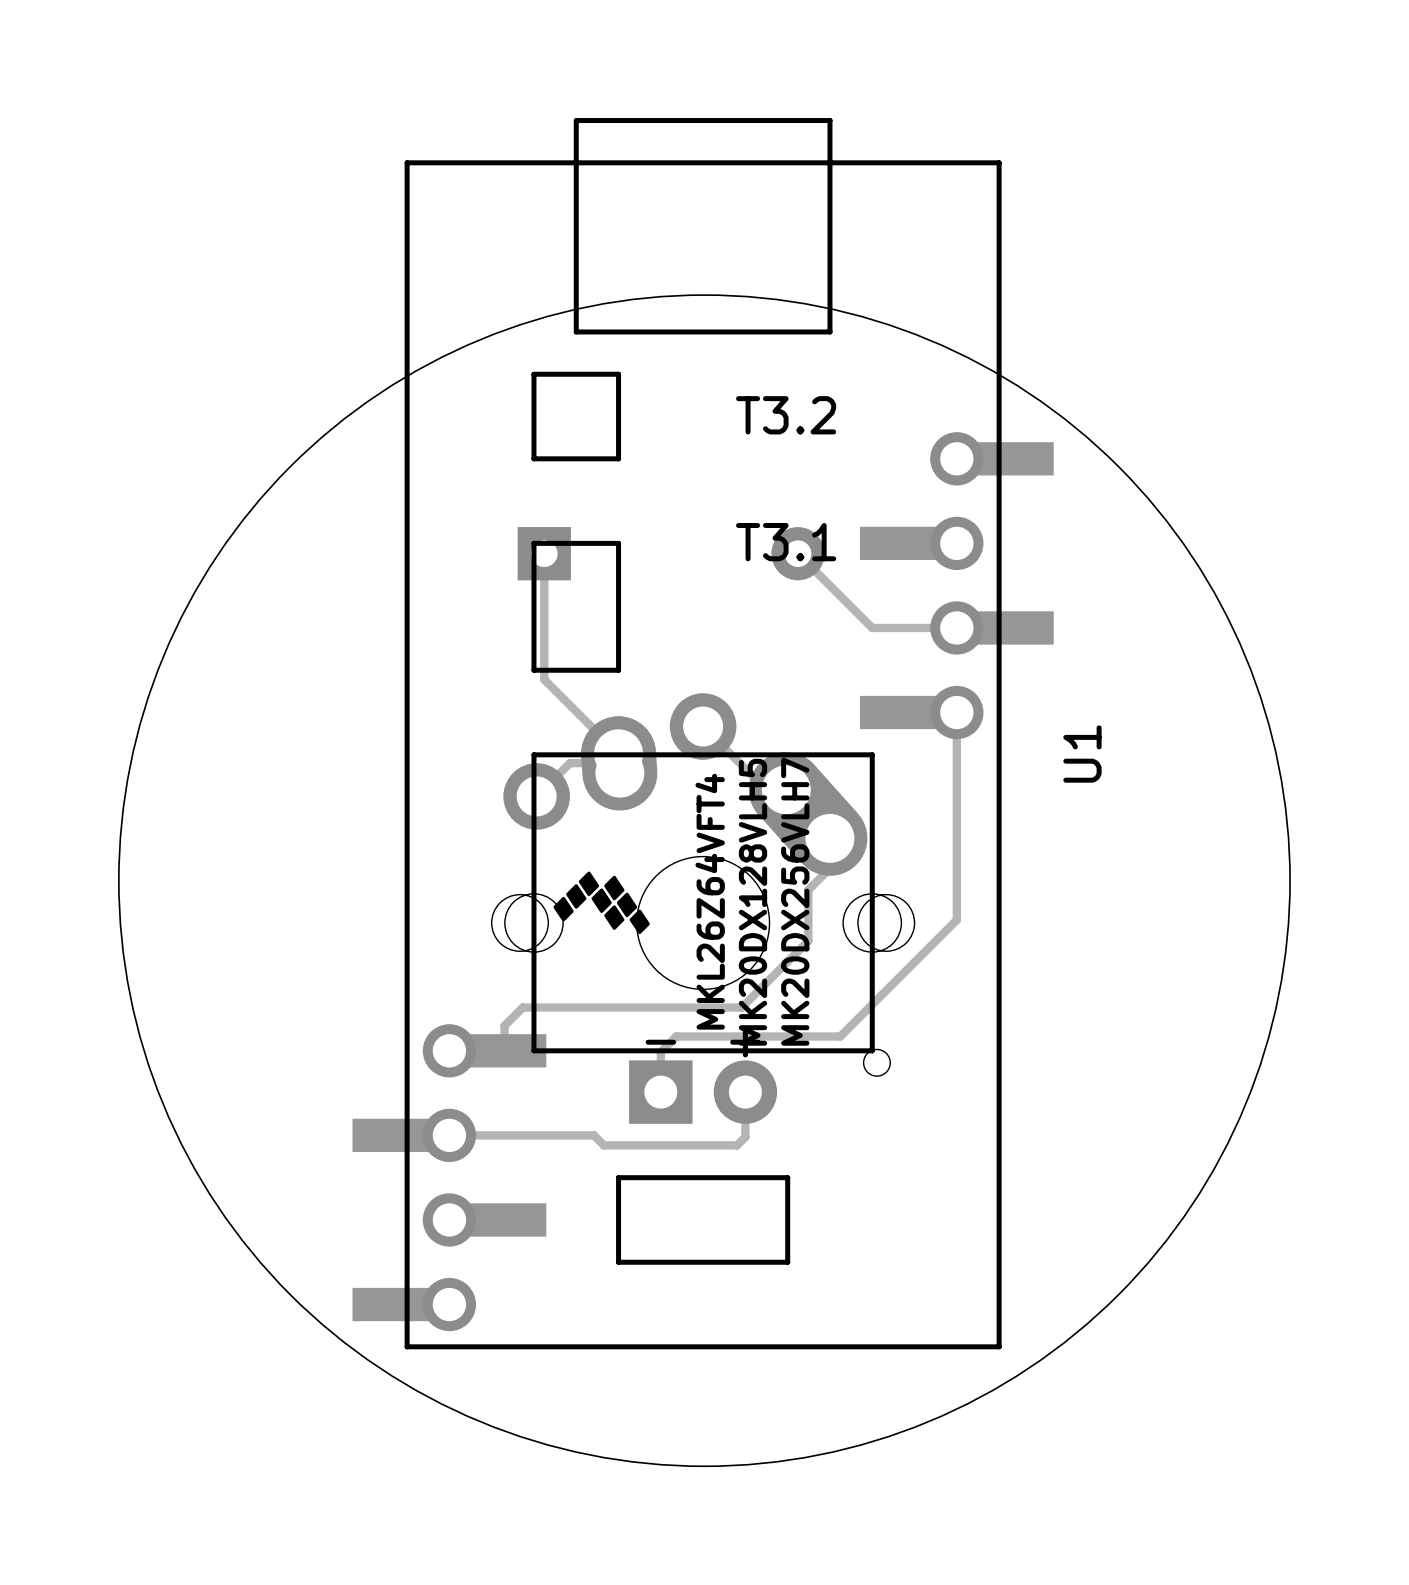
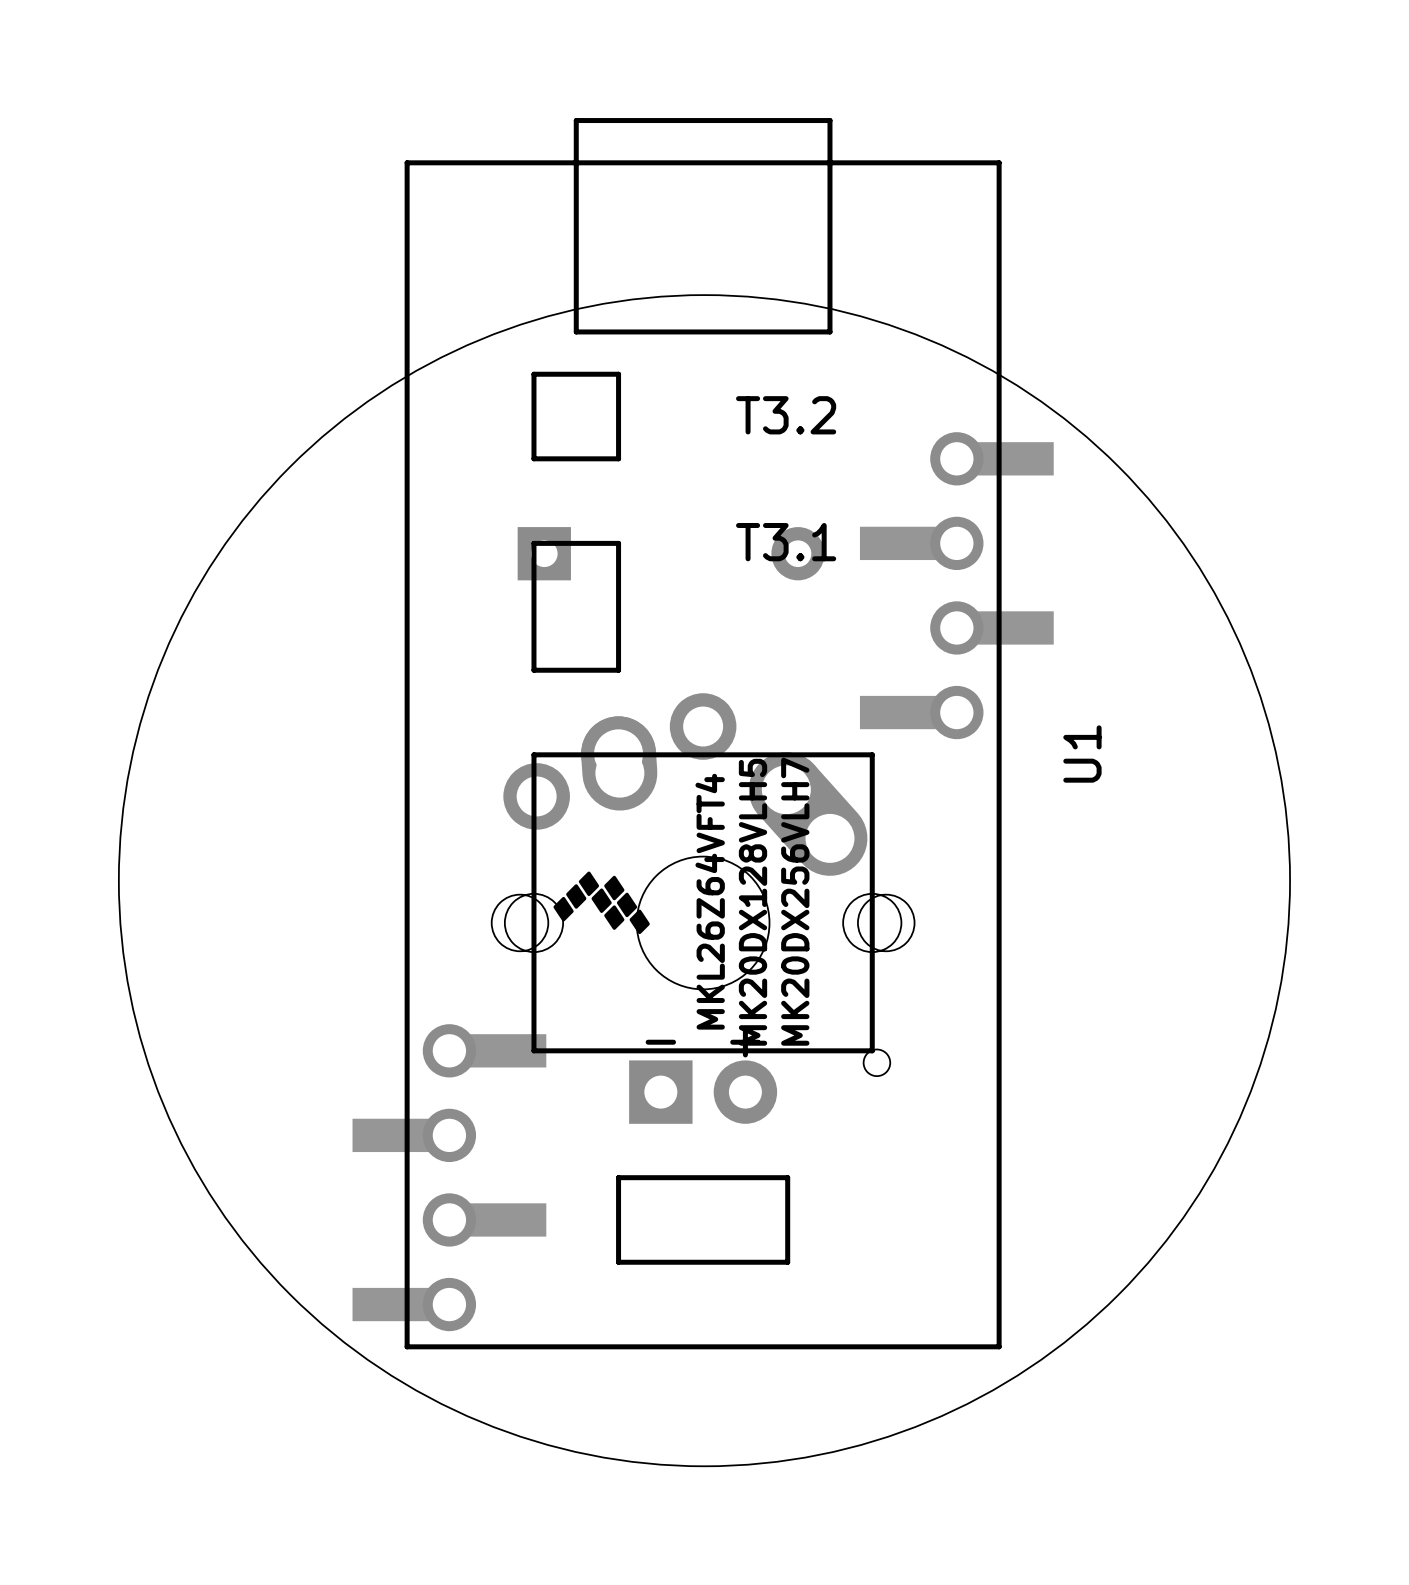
track: (544, 553) (544, 679) (618, 753) (609, 763) (569, 763) (536, 796) -> none
track: (798, 553) (872, 627) (956, 627) -> none
track: (956, 712) (956, 919) (840, 1036) (676, 1036) (660, 1052) (660, 1092) -> none
track: (703, 726) (815, 838) (829, 838) (829, 868) (808, 890) (808, 940) (741, 1007) (522, 1007) (504, 1025) (504, 1050) -> none
track: (745, 1092) (745, 1136) (736, 1145) (603, 1145) (593, 1135) (449, 1135) -> none

